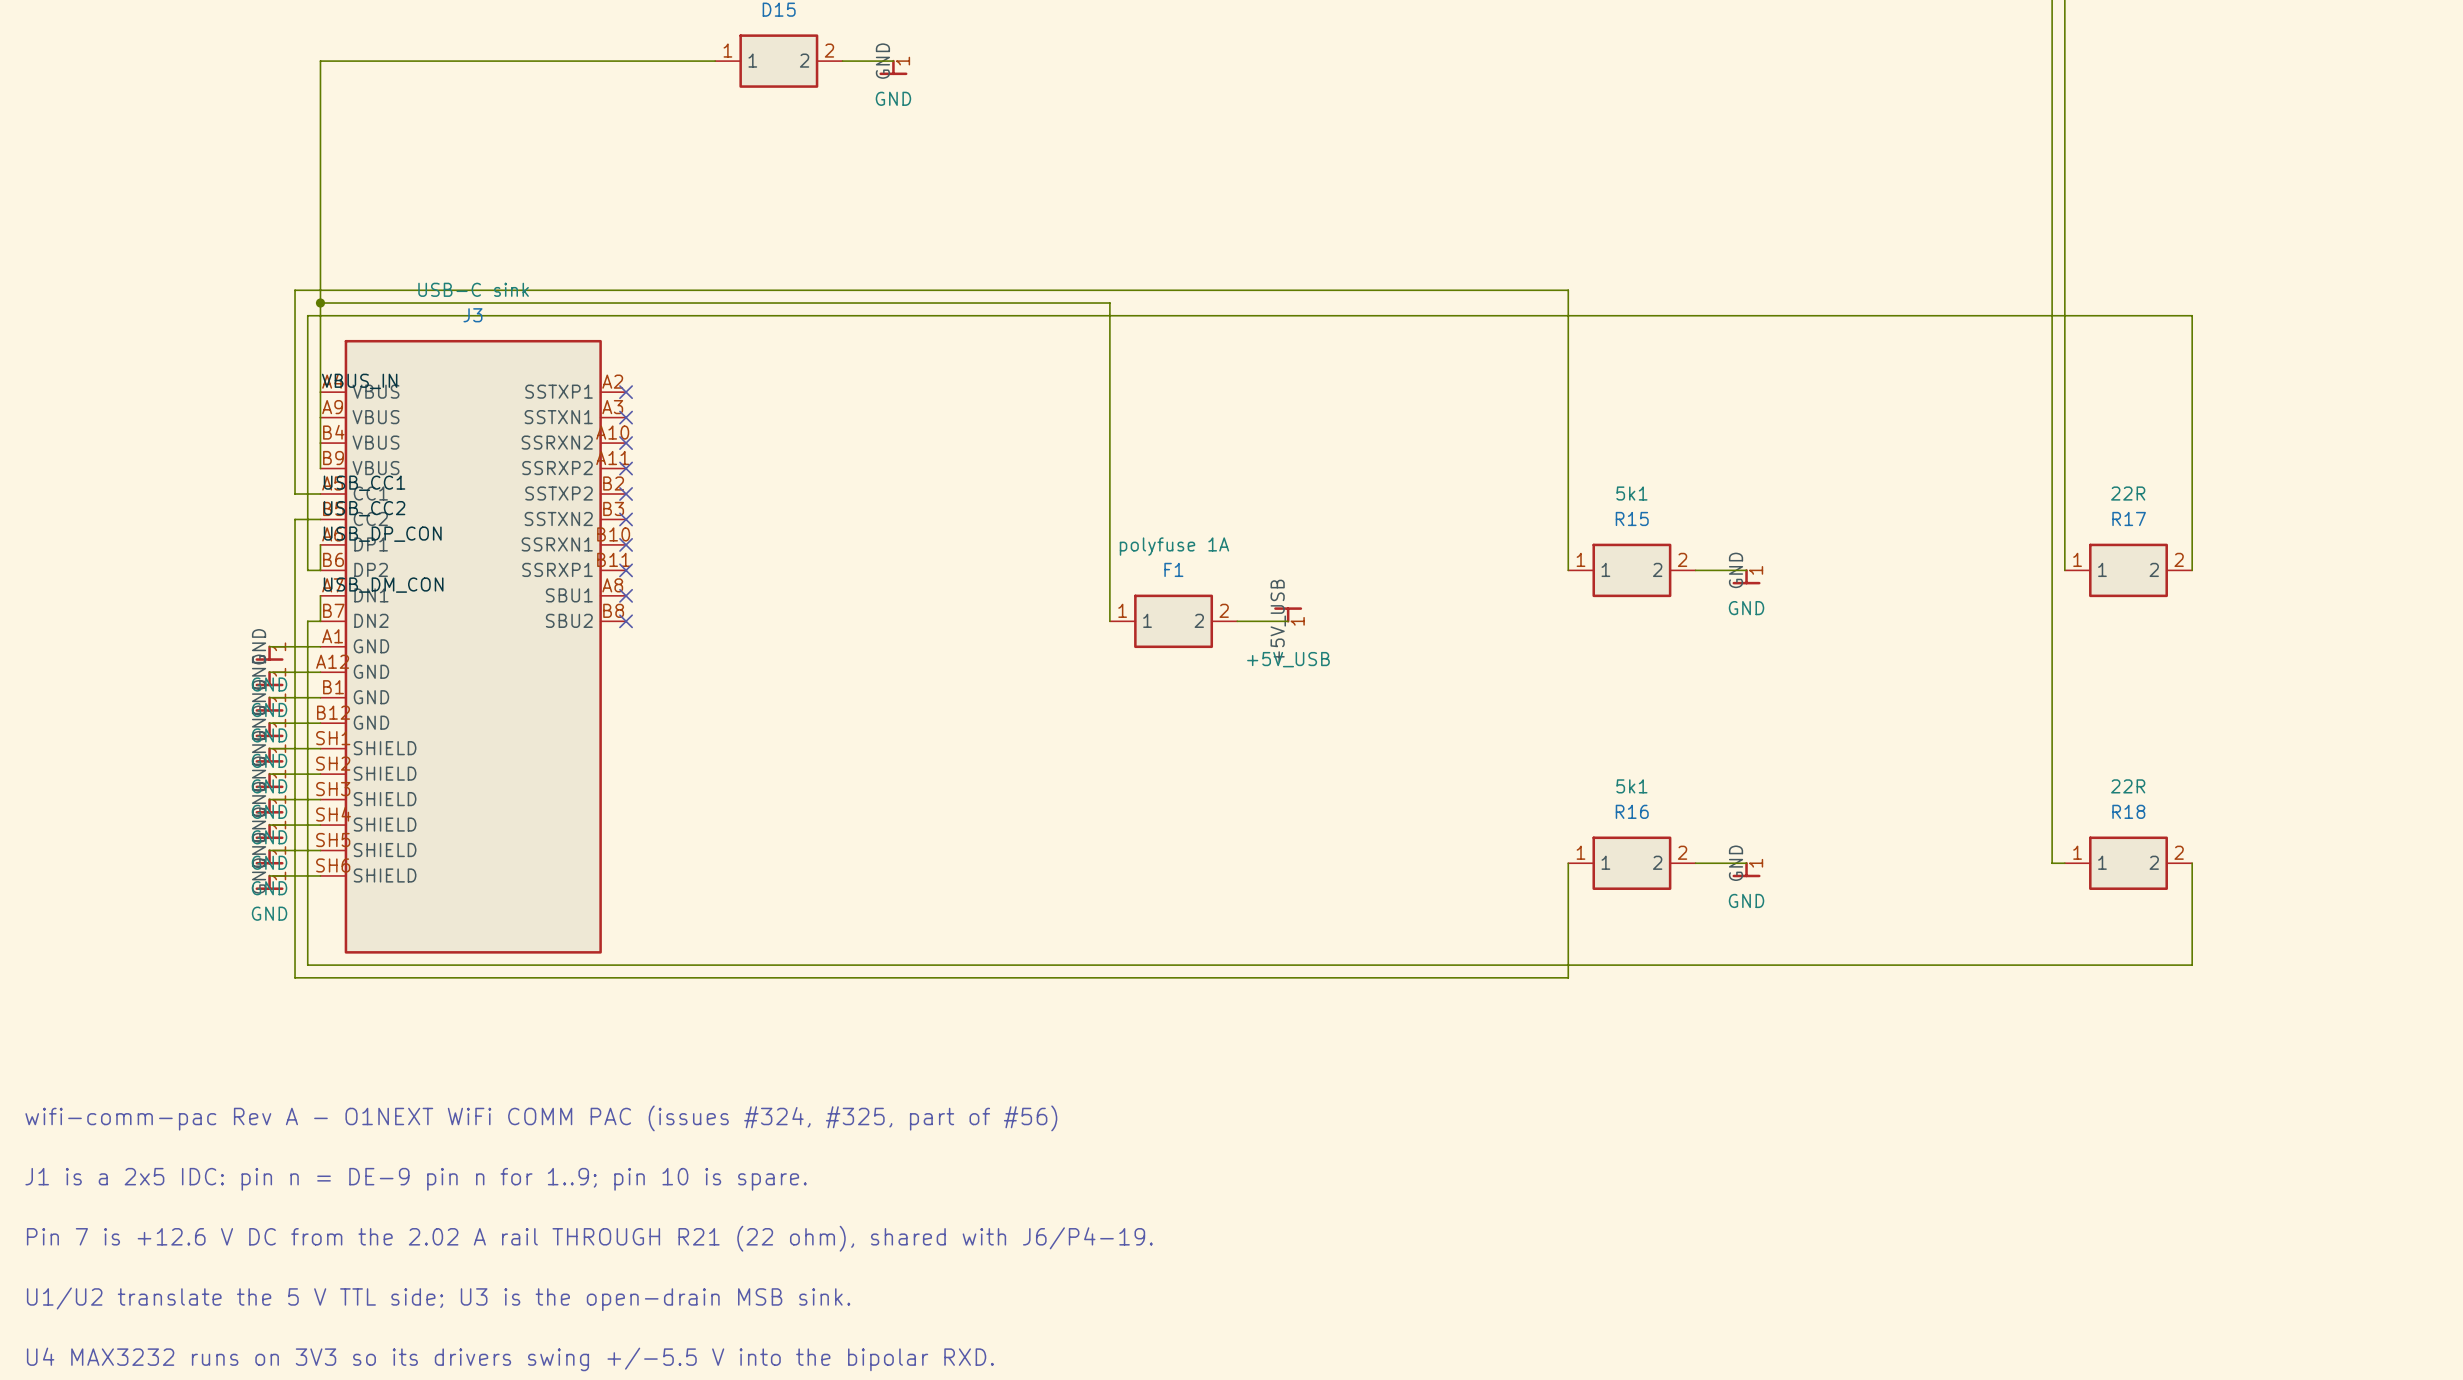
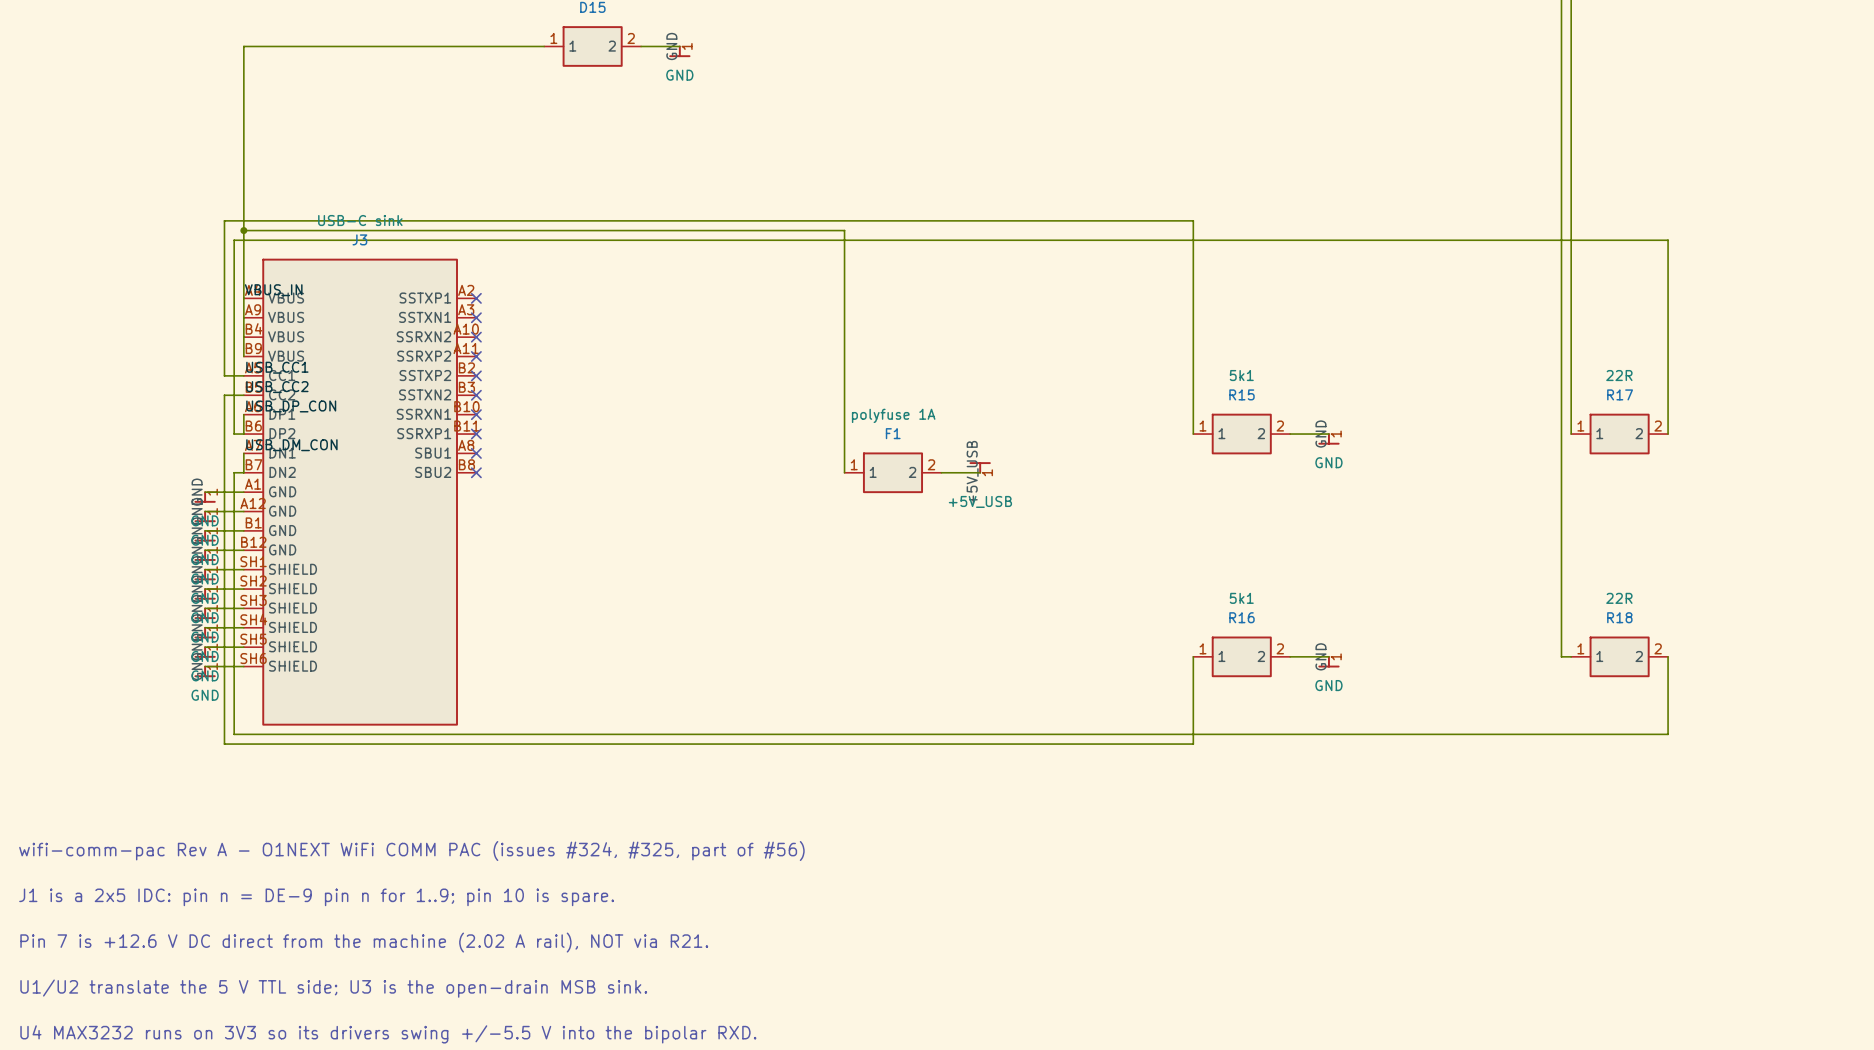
text: Pin 7 is +12.6 V DC from the 2.02 A rail THROUGH R21 (22 ohm), shared with J6/P4-19. (589, 1238) -> Pin 7 is +12.6 V DC direct from the machine (2.02 A rail), NOT via R21. (364, 942)

